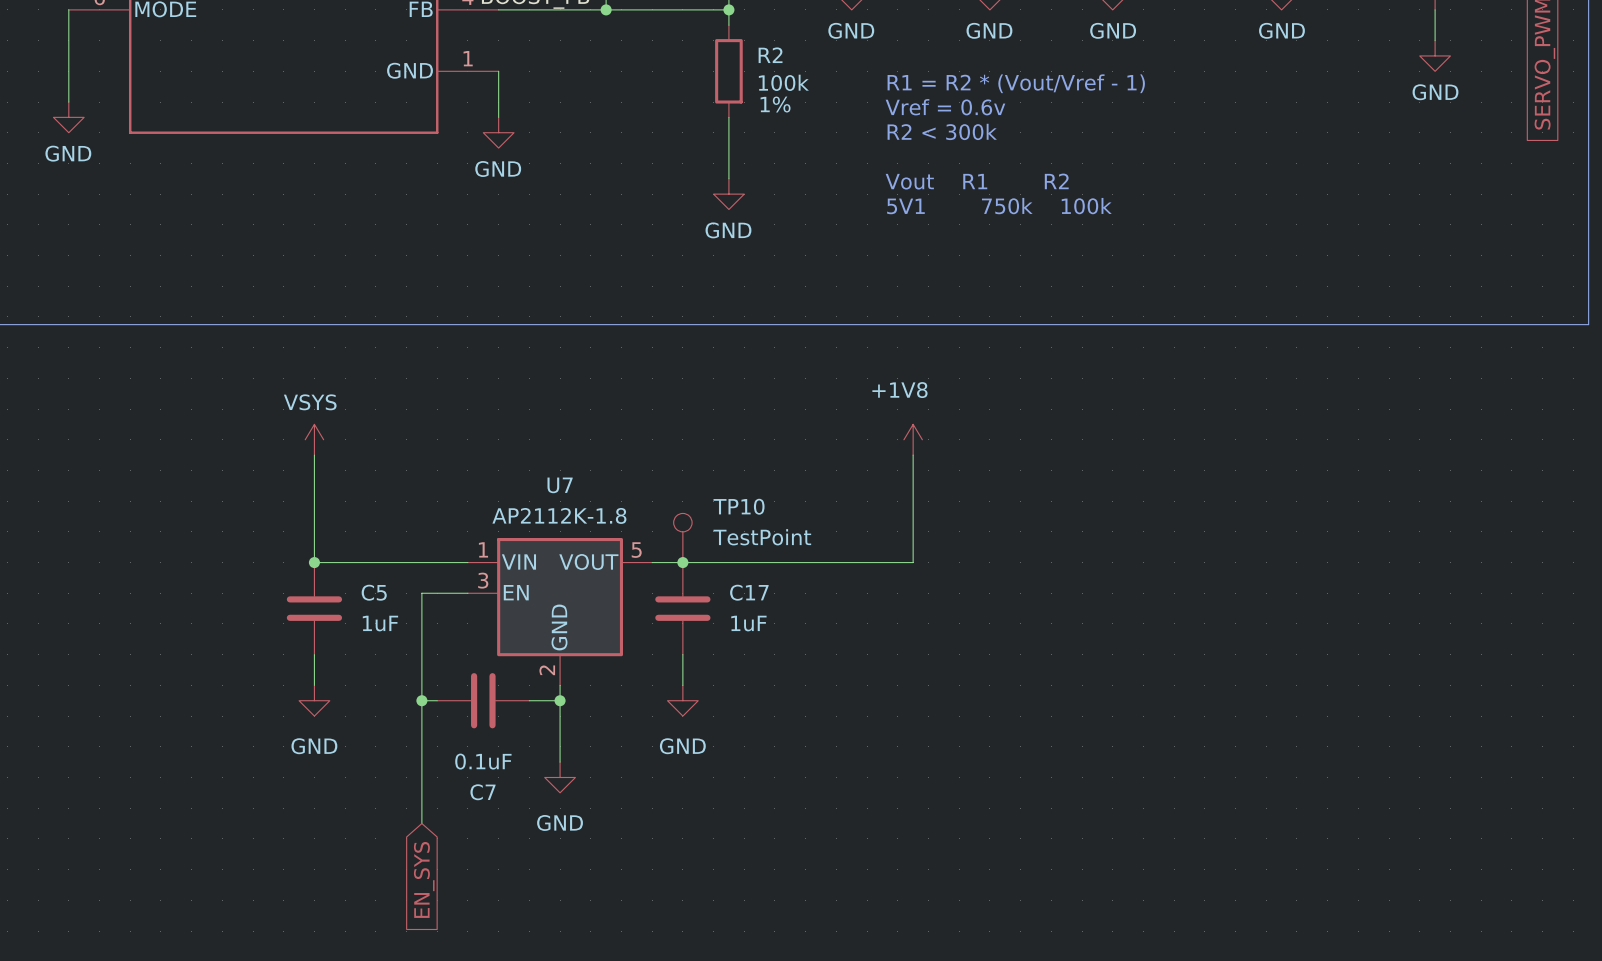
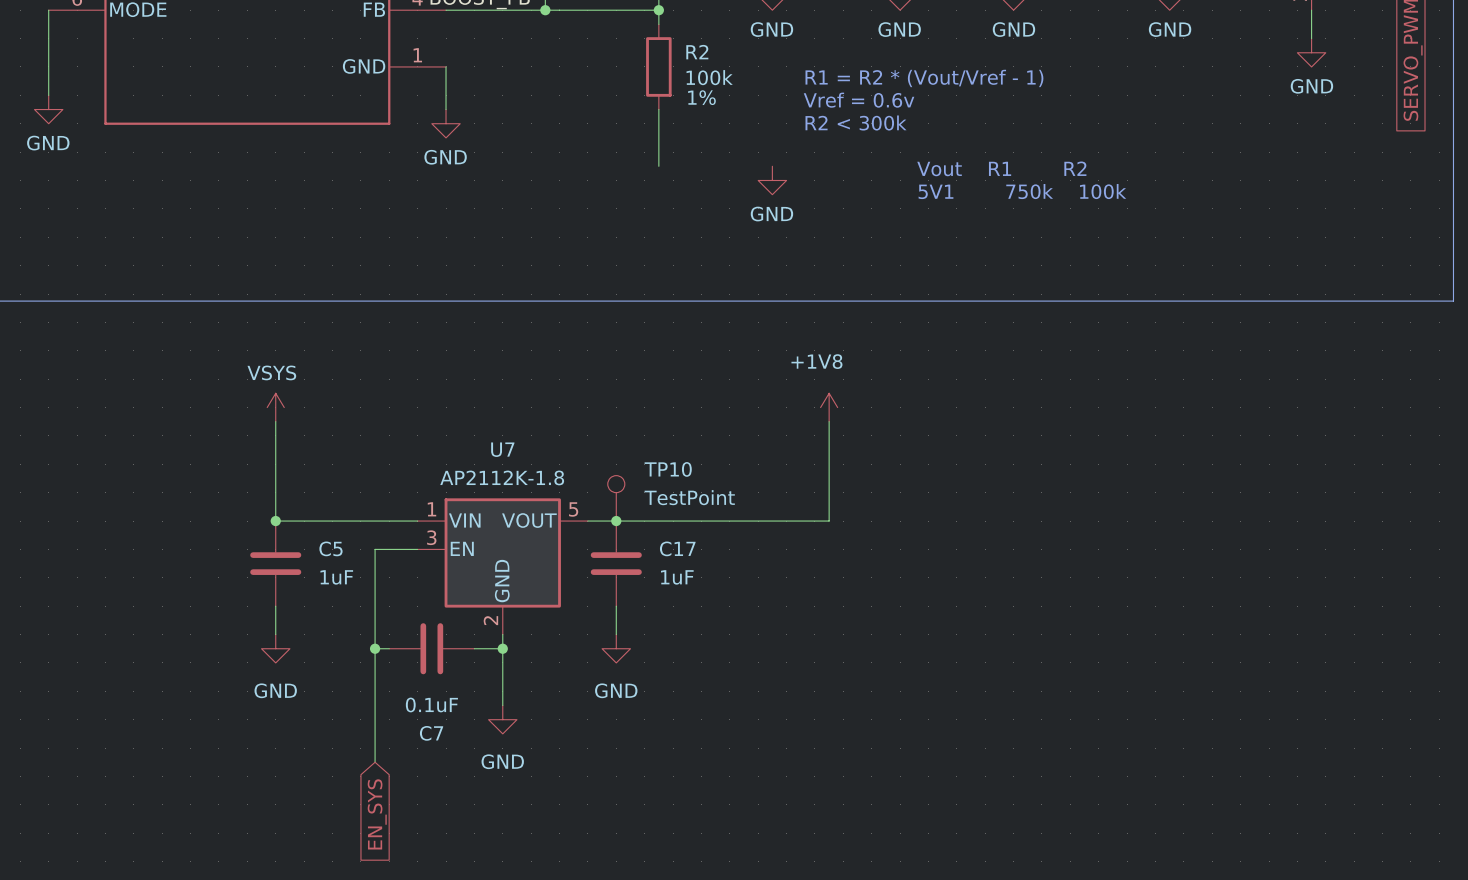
text position: Vout R1 R2 (977, 181) -> Vout R1 R2 (1001, 168)
power symbol position: GND (728, 194) -> GND (772, 180)
text position: 5V1 750k 100k (999, 206) -> 5V1 750k 100k (1022, 191)

